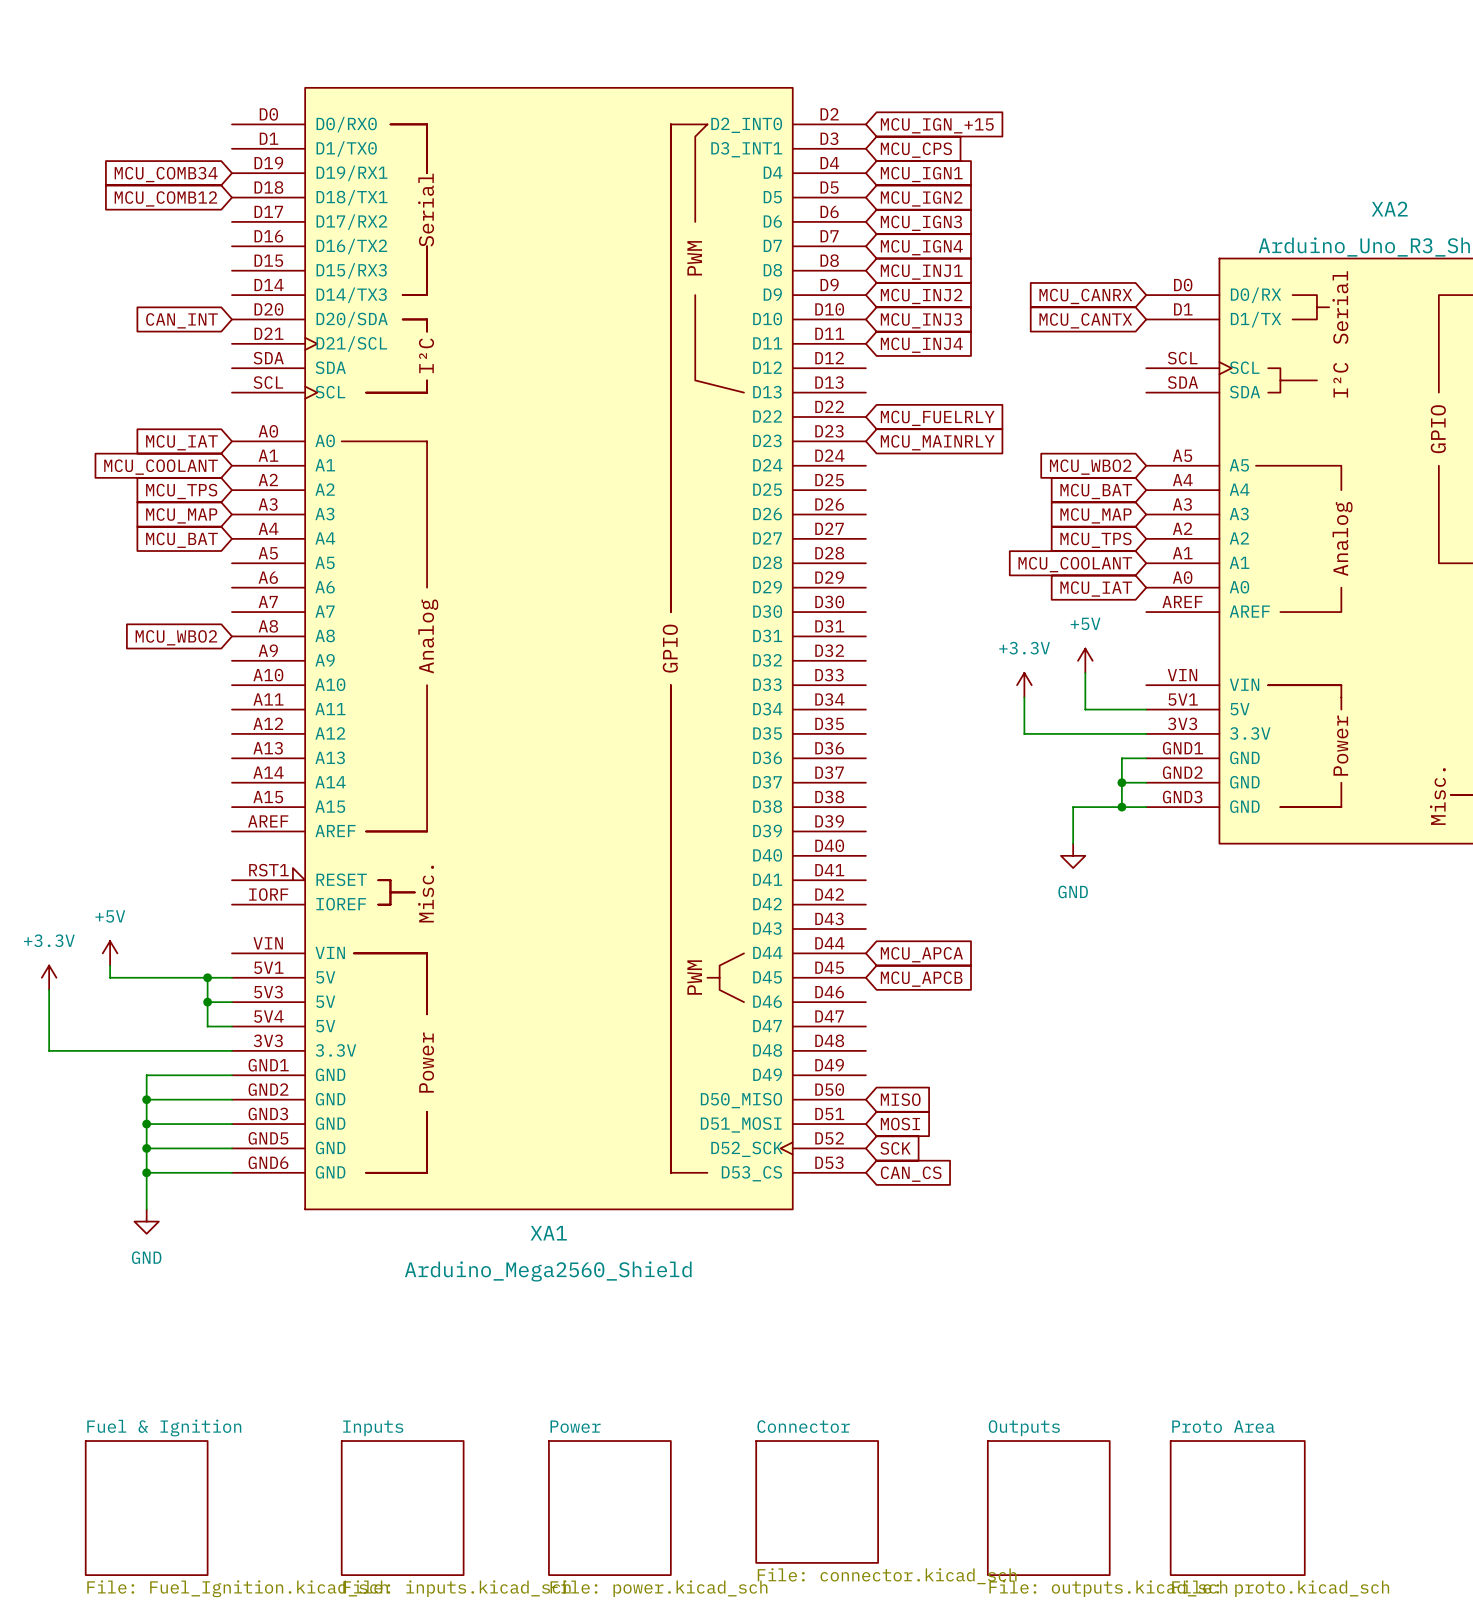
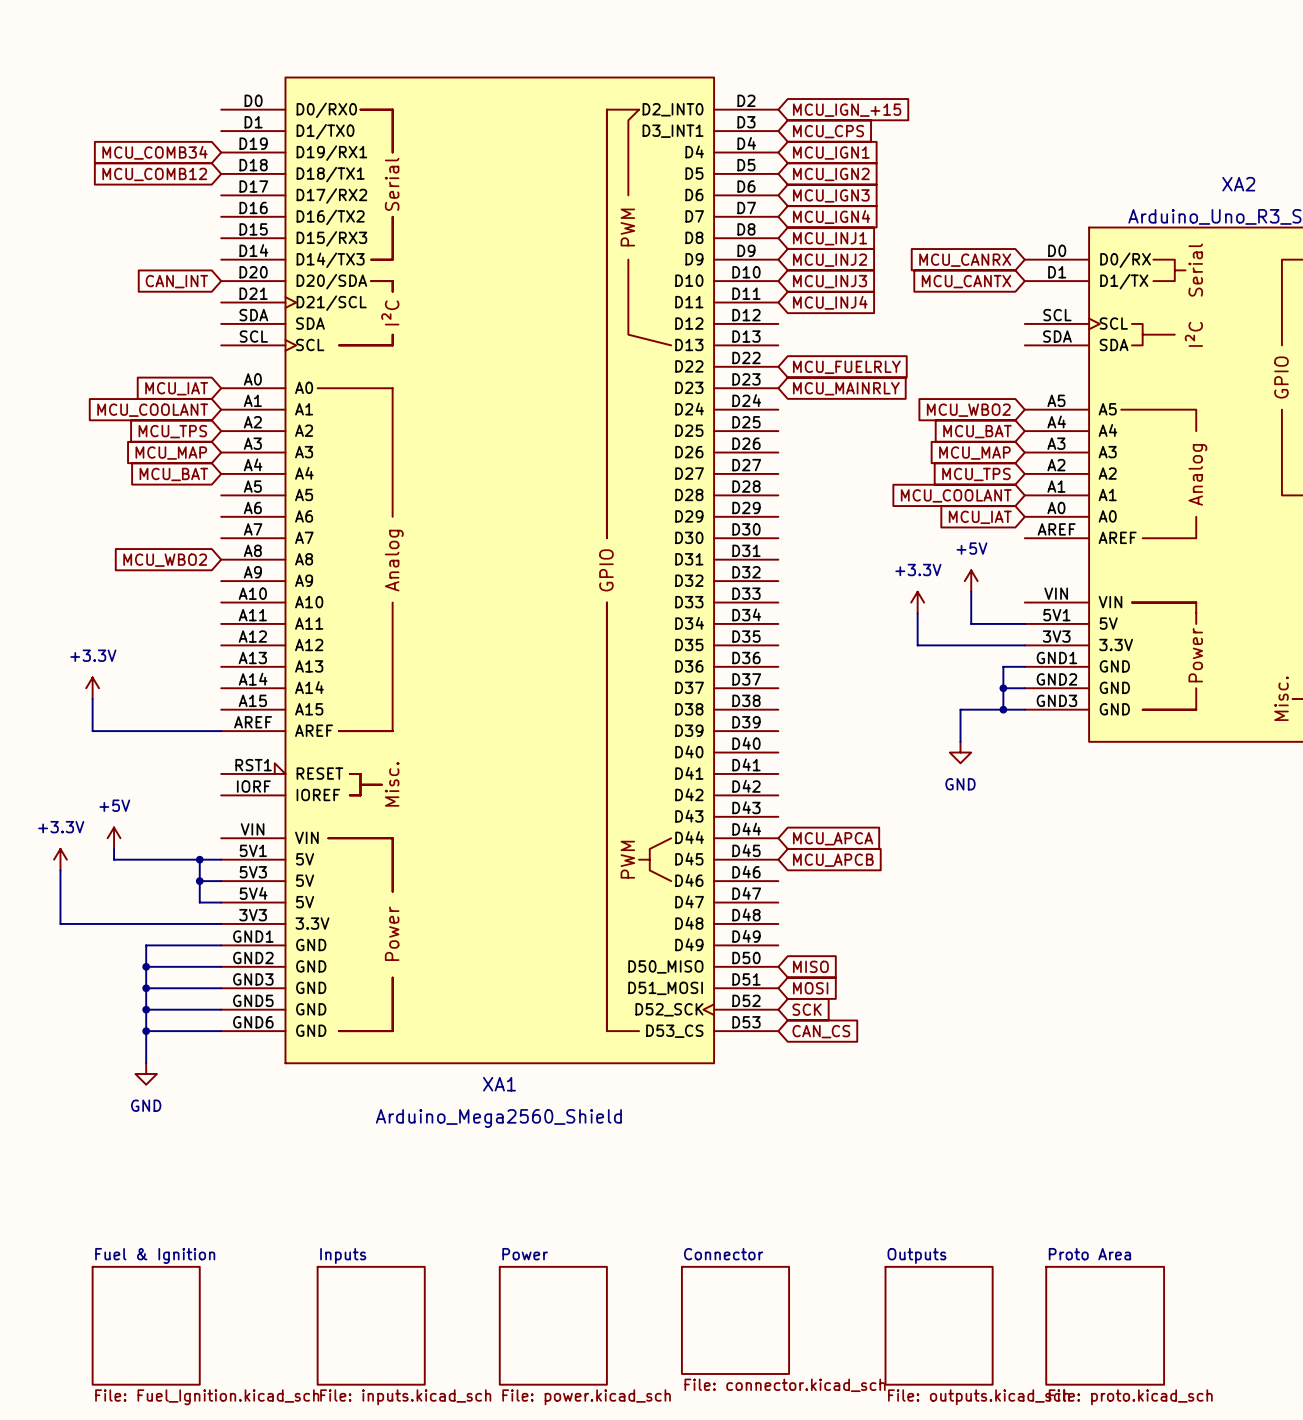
power symbol: none -> +3.3V (92, 688)
wire: none -> (92, 698) (92, 731) (221, 731)

